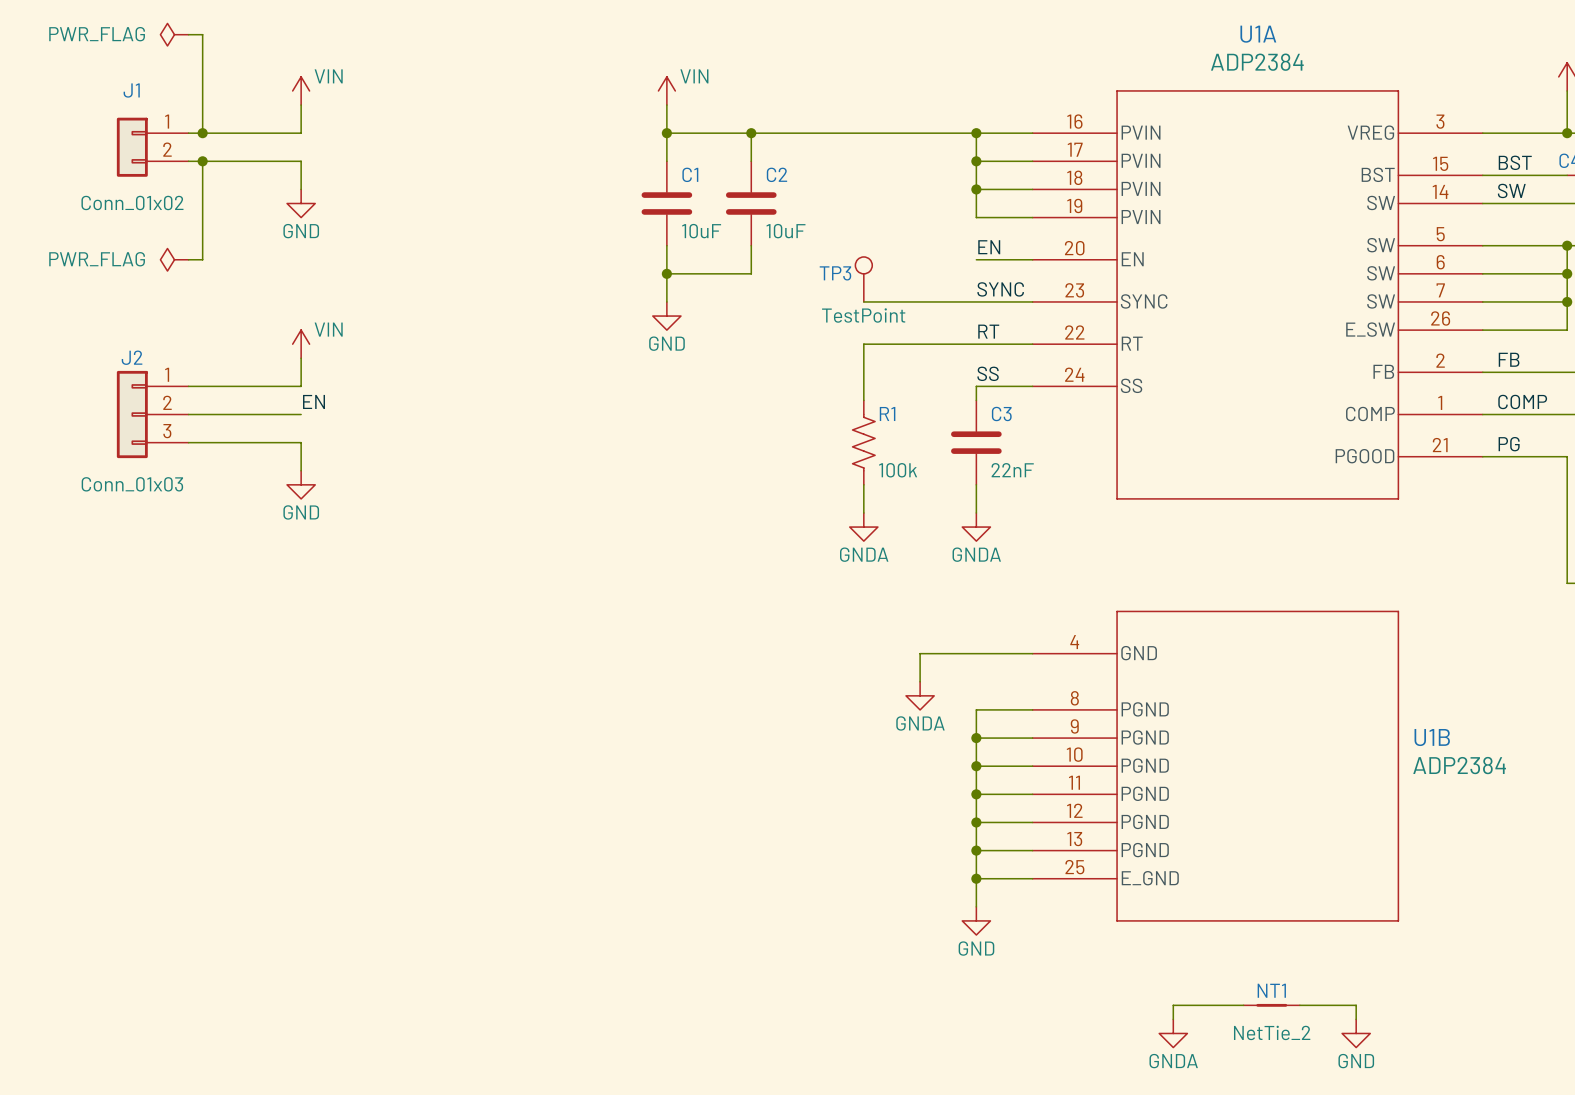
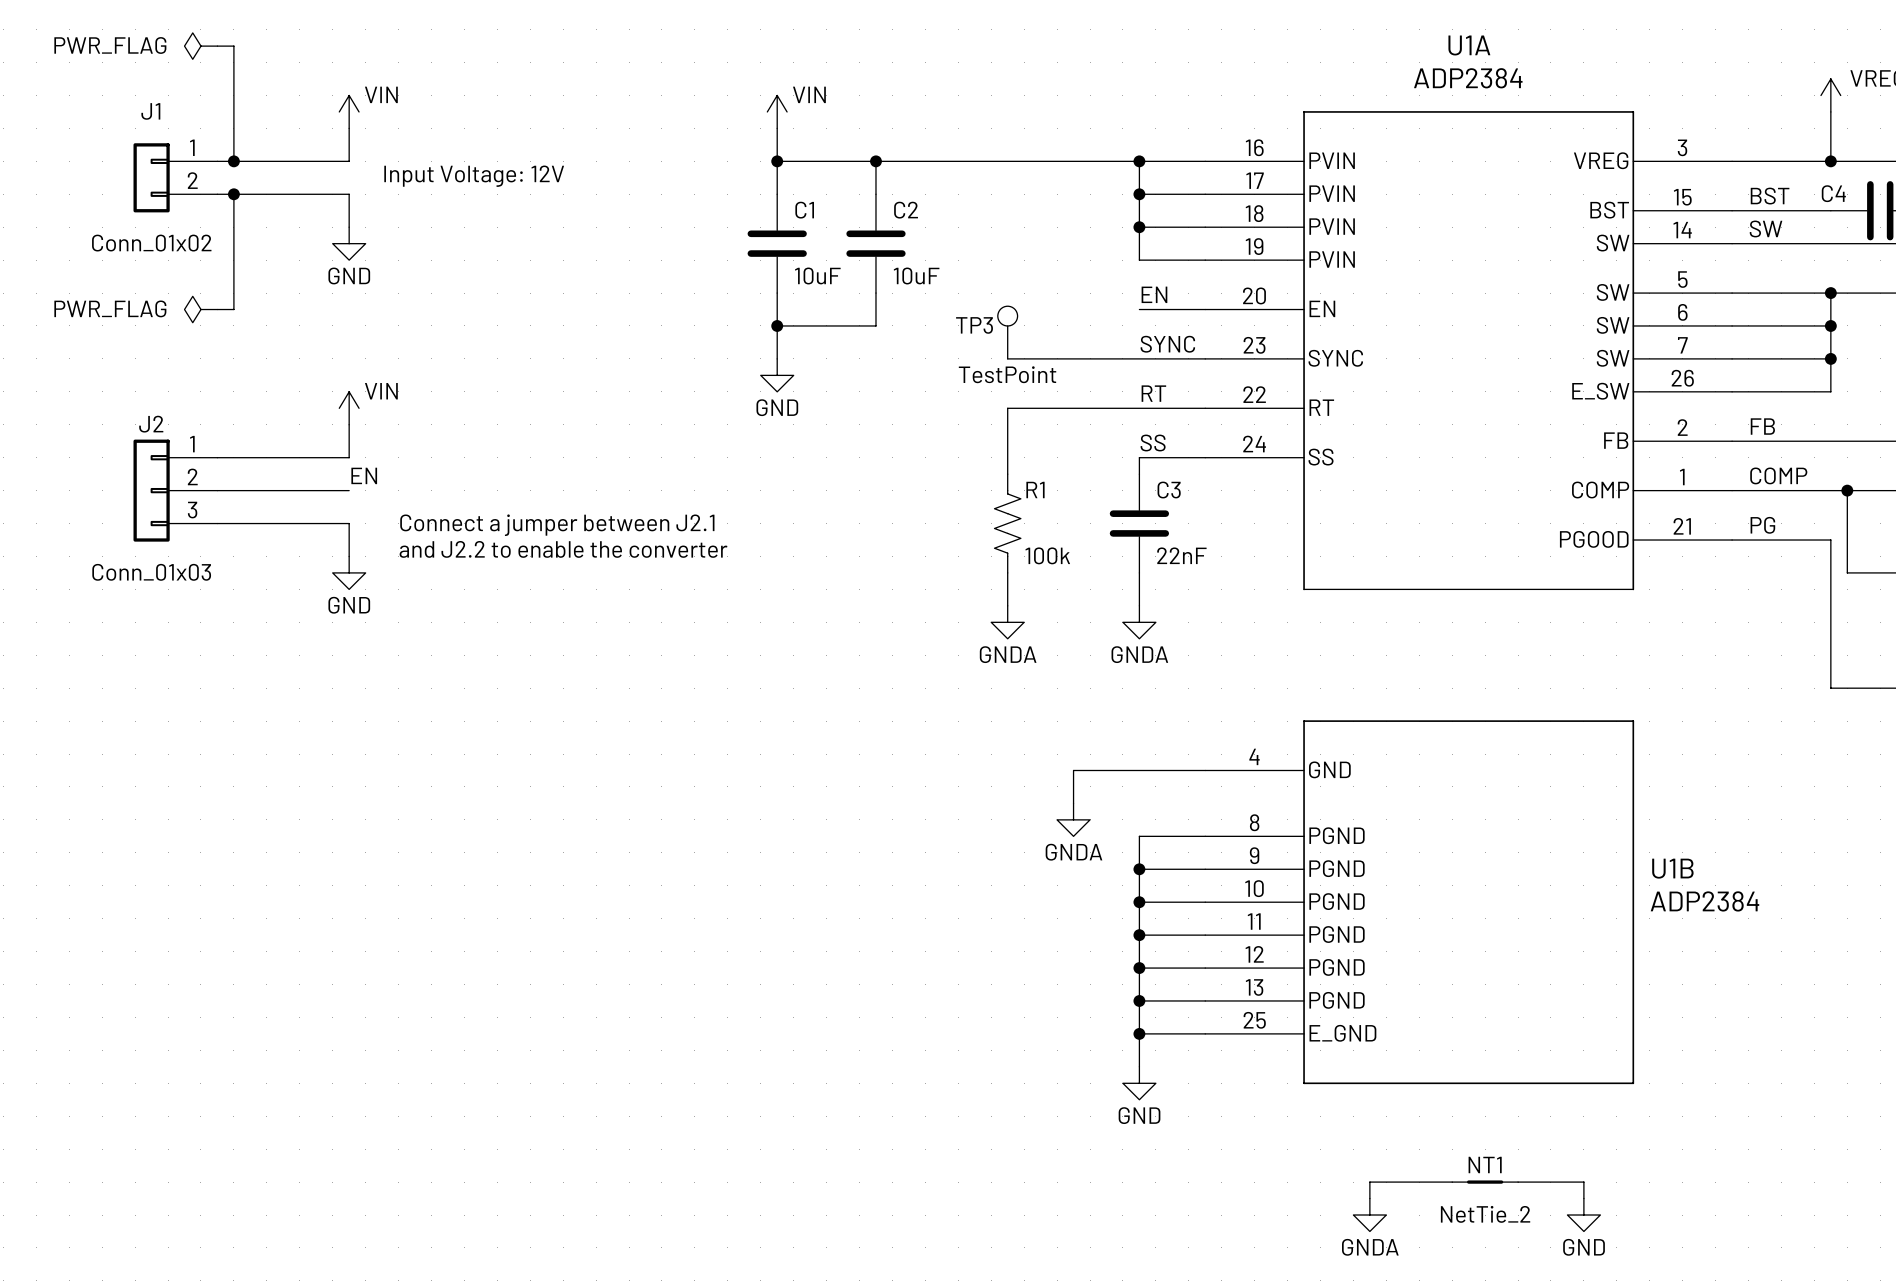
text: none -> Input Voltage: 12V (474, 176)
text: none -> Connect a jumper between J2.1 (557, 525)
text: none -> and J2.2 to enable the converter (563, 549)

